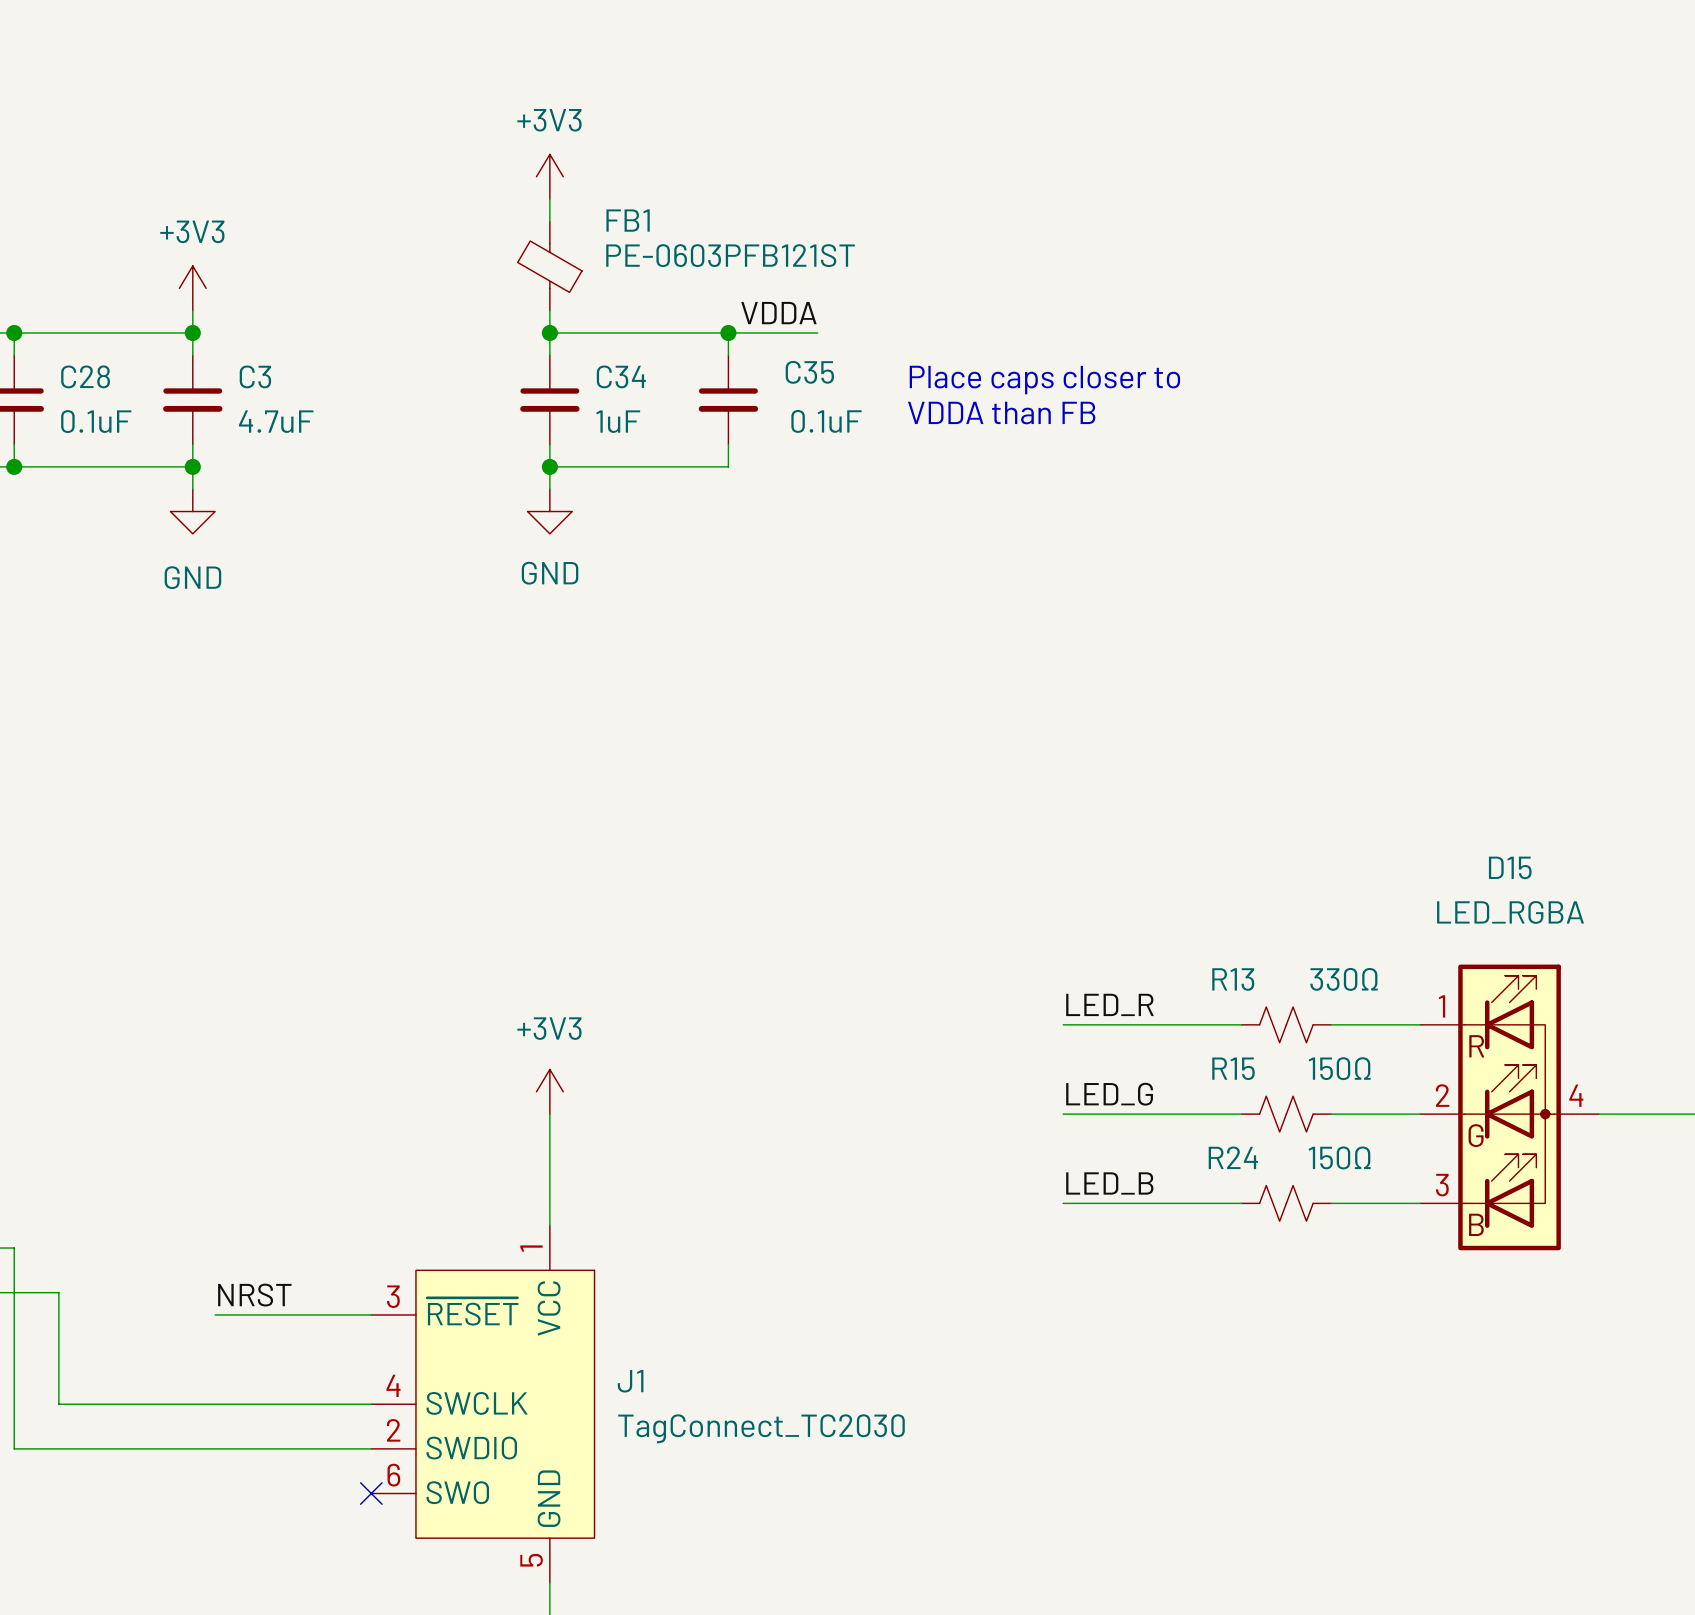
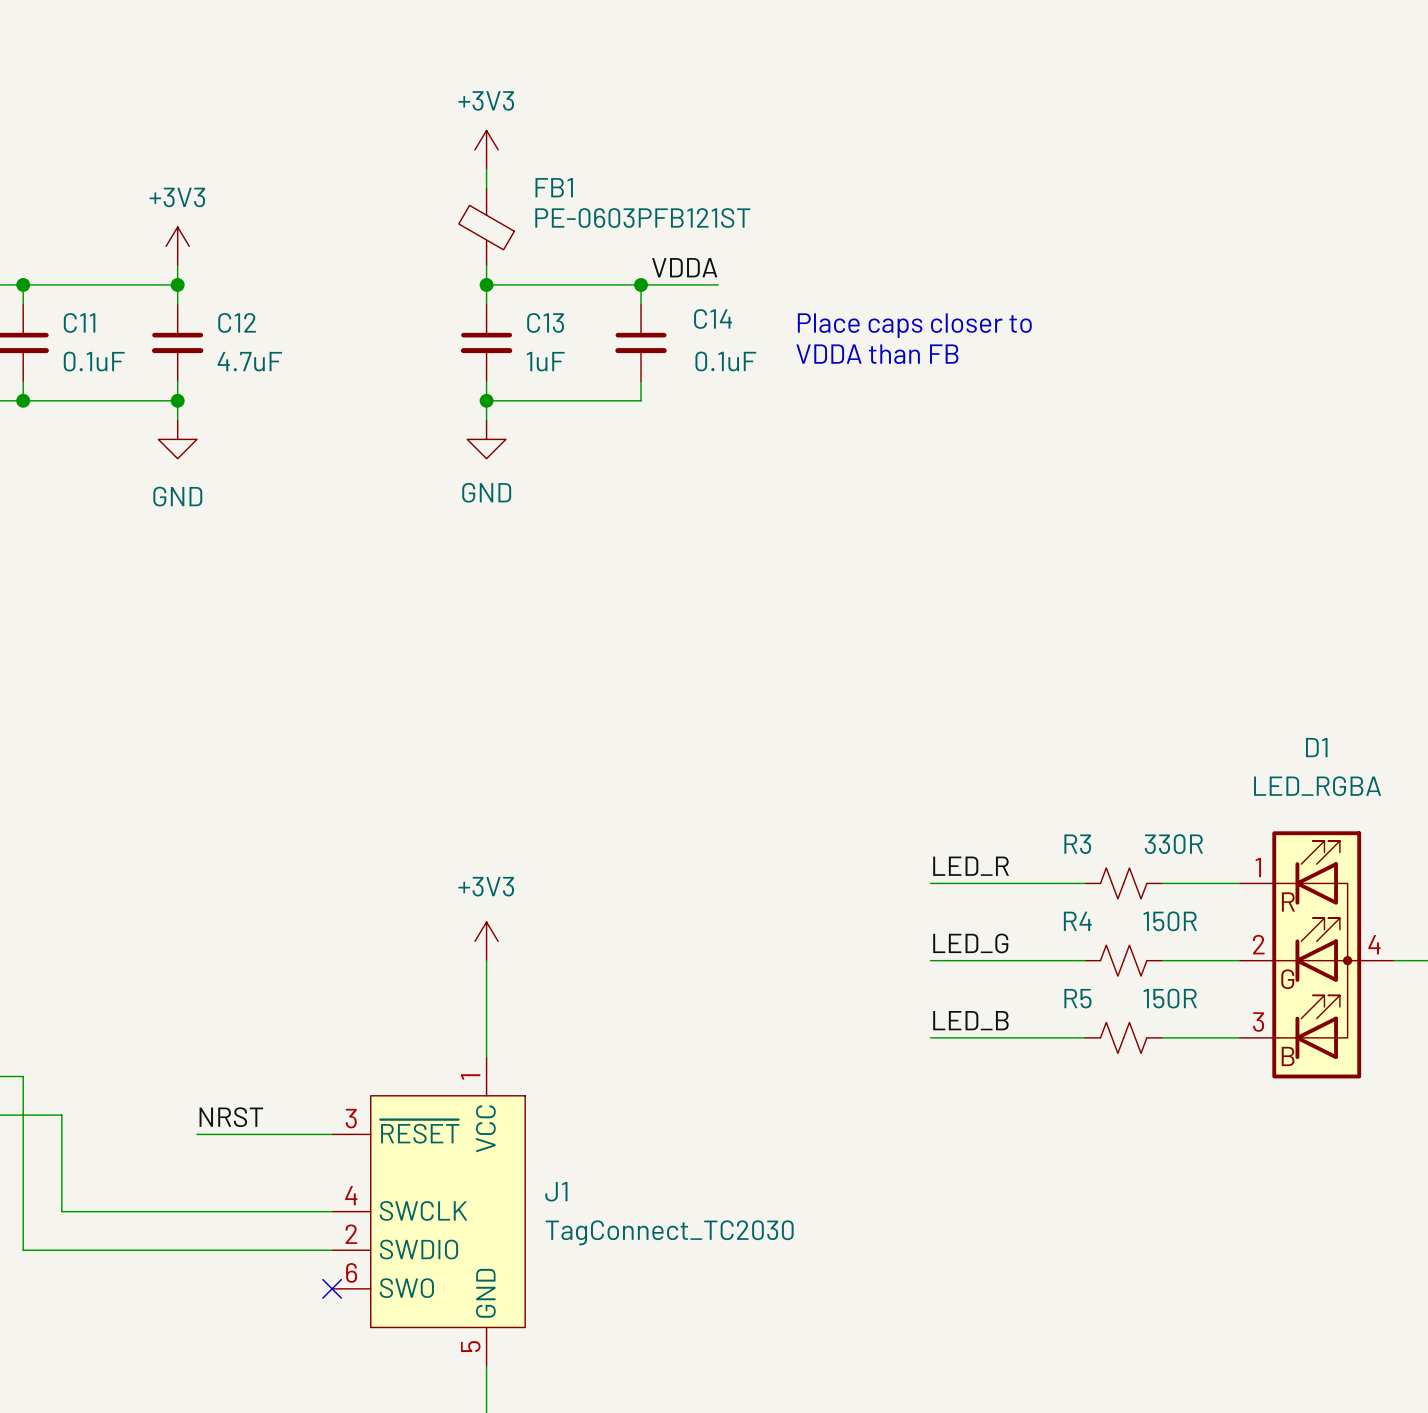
C35 name: C35 (809, 372) -> C14 (713, 318)
C28 name: C28 (85, 376) -> C11 (79, 322)
C3 name: C3 (255, 376) -> C12 (237, 322)
C34 name: C34 (621, 376) -> C13 (545, 322)
D15 name: D15 (1510, 867) -> D1 (1316, 747)
R13 name: R13 (1233, 979) -> R3 (1077, 844)
R13 value: 330Ω (1344, 979) -> 330R (1173, 844)
R15 name: R15 (1233, 1068) -> R4 (1077, 921)
R15 value: 150Ω (1339, 1068) -> 150R (1170, 921)
R24 name: R24 (1233, 1157) -> R5 (1077, 998)
R24 value: 150Ω (1339, 1157) -> 150R (1170, 998)

